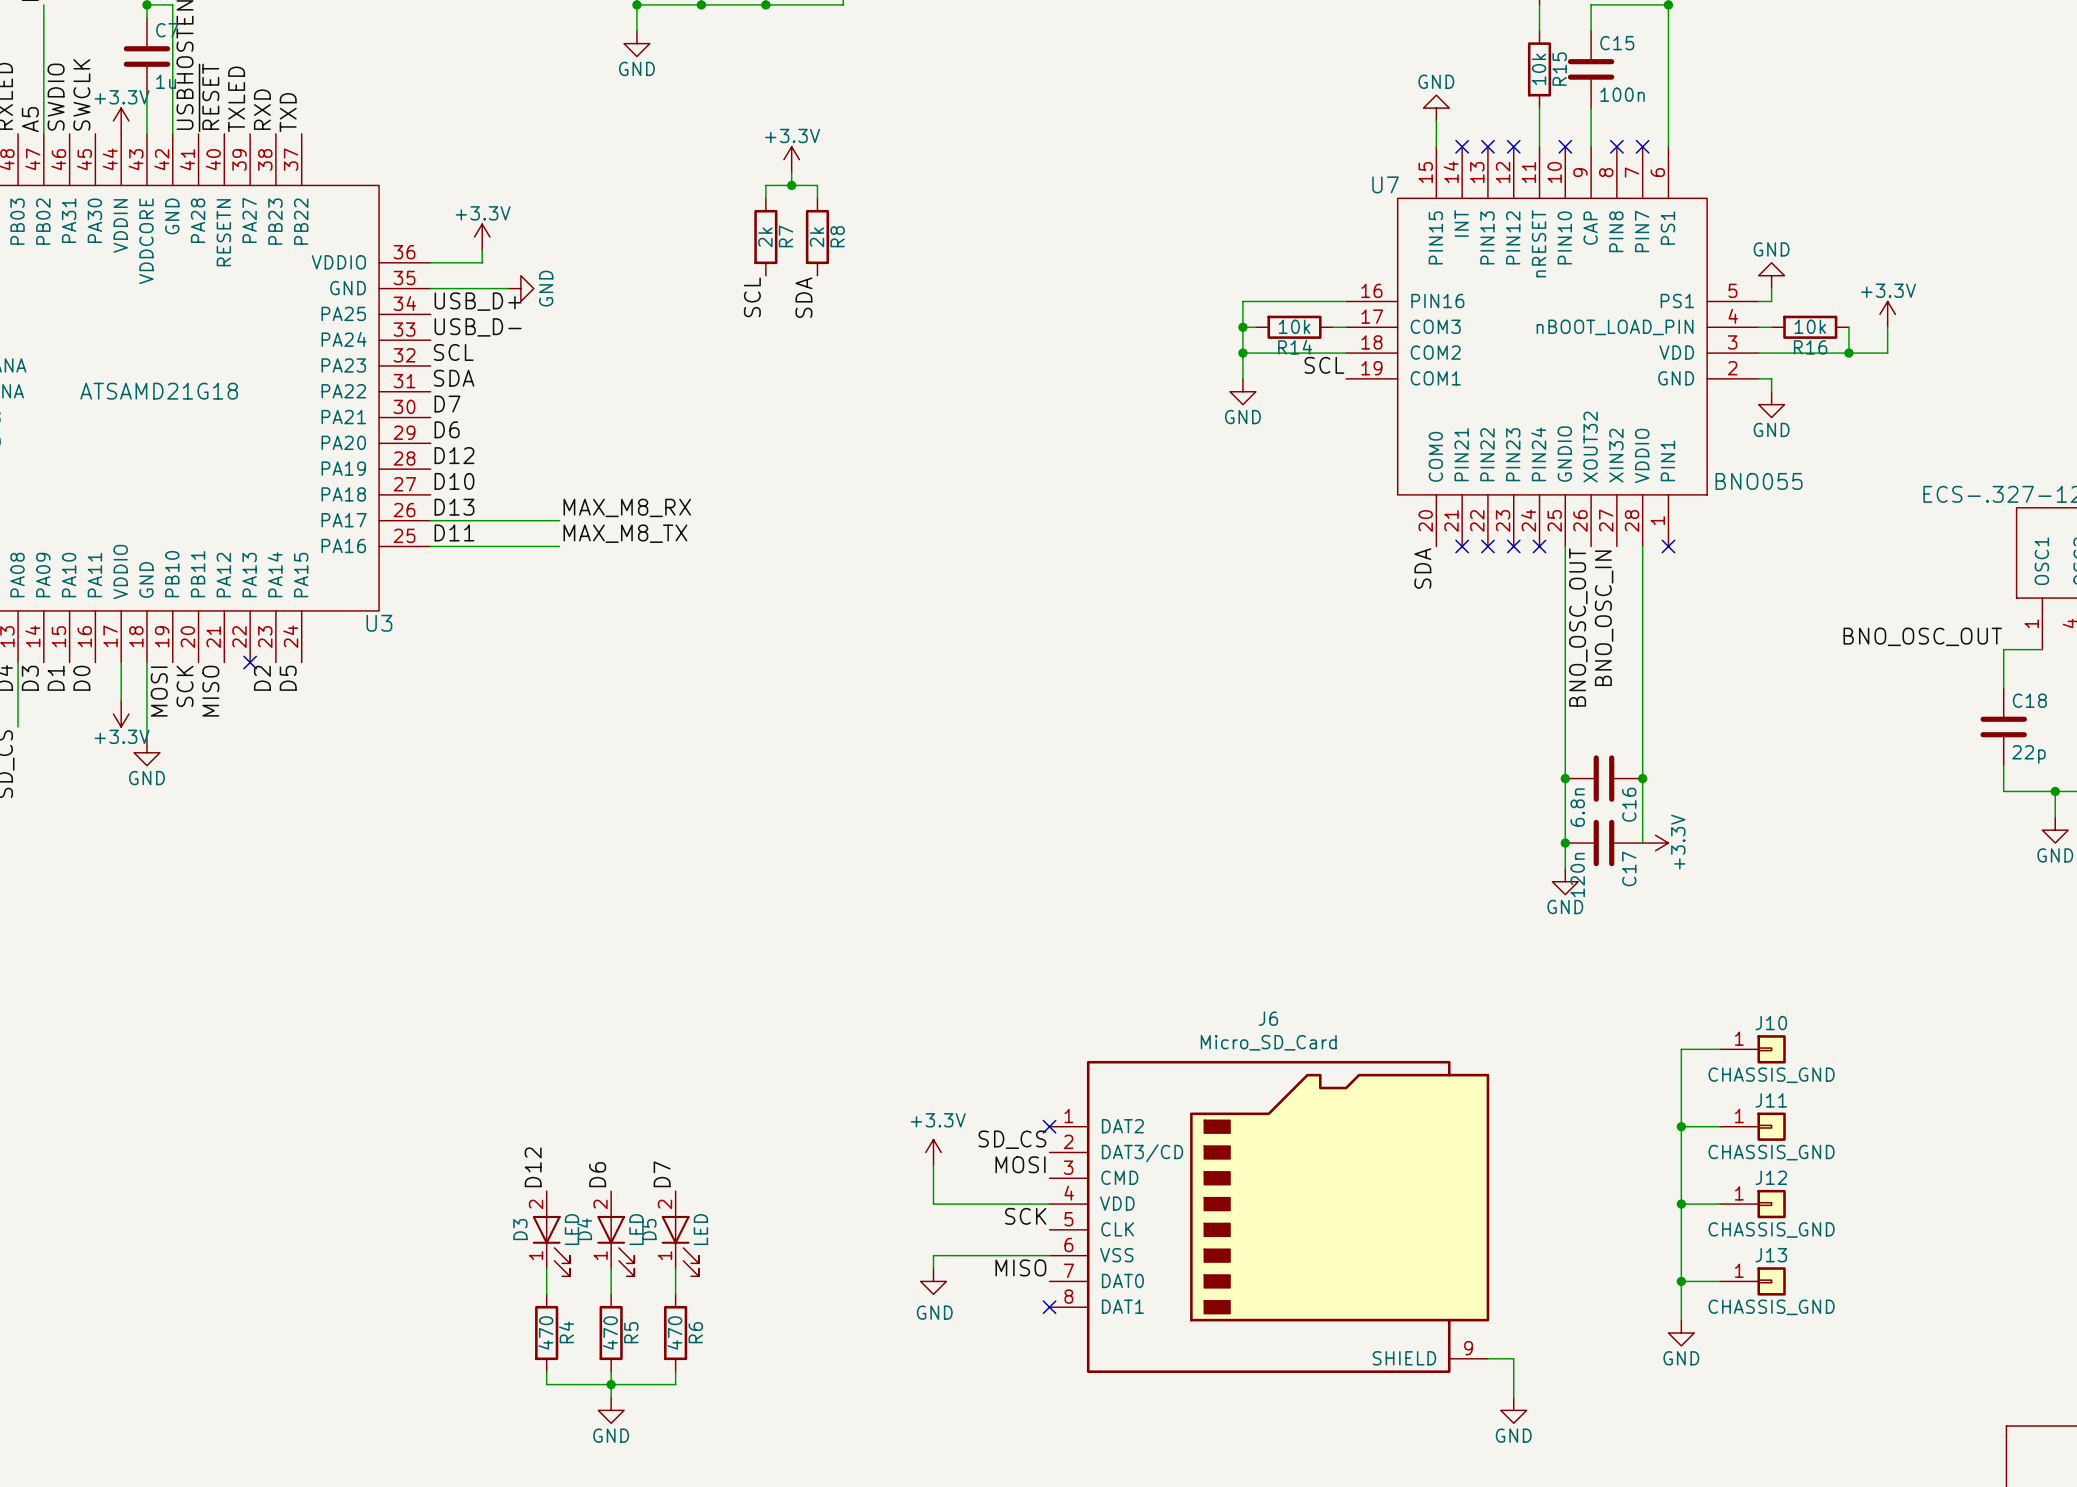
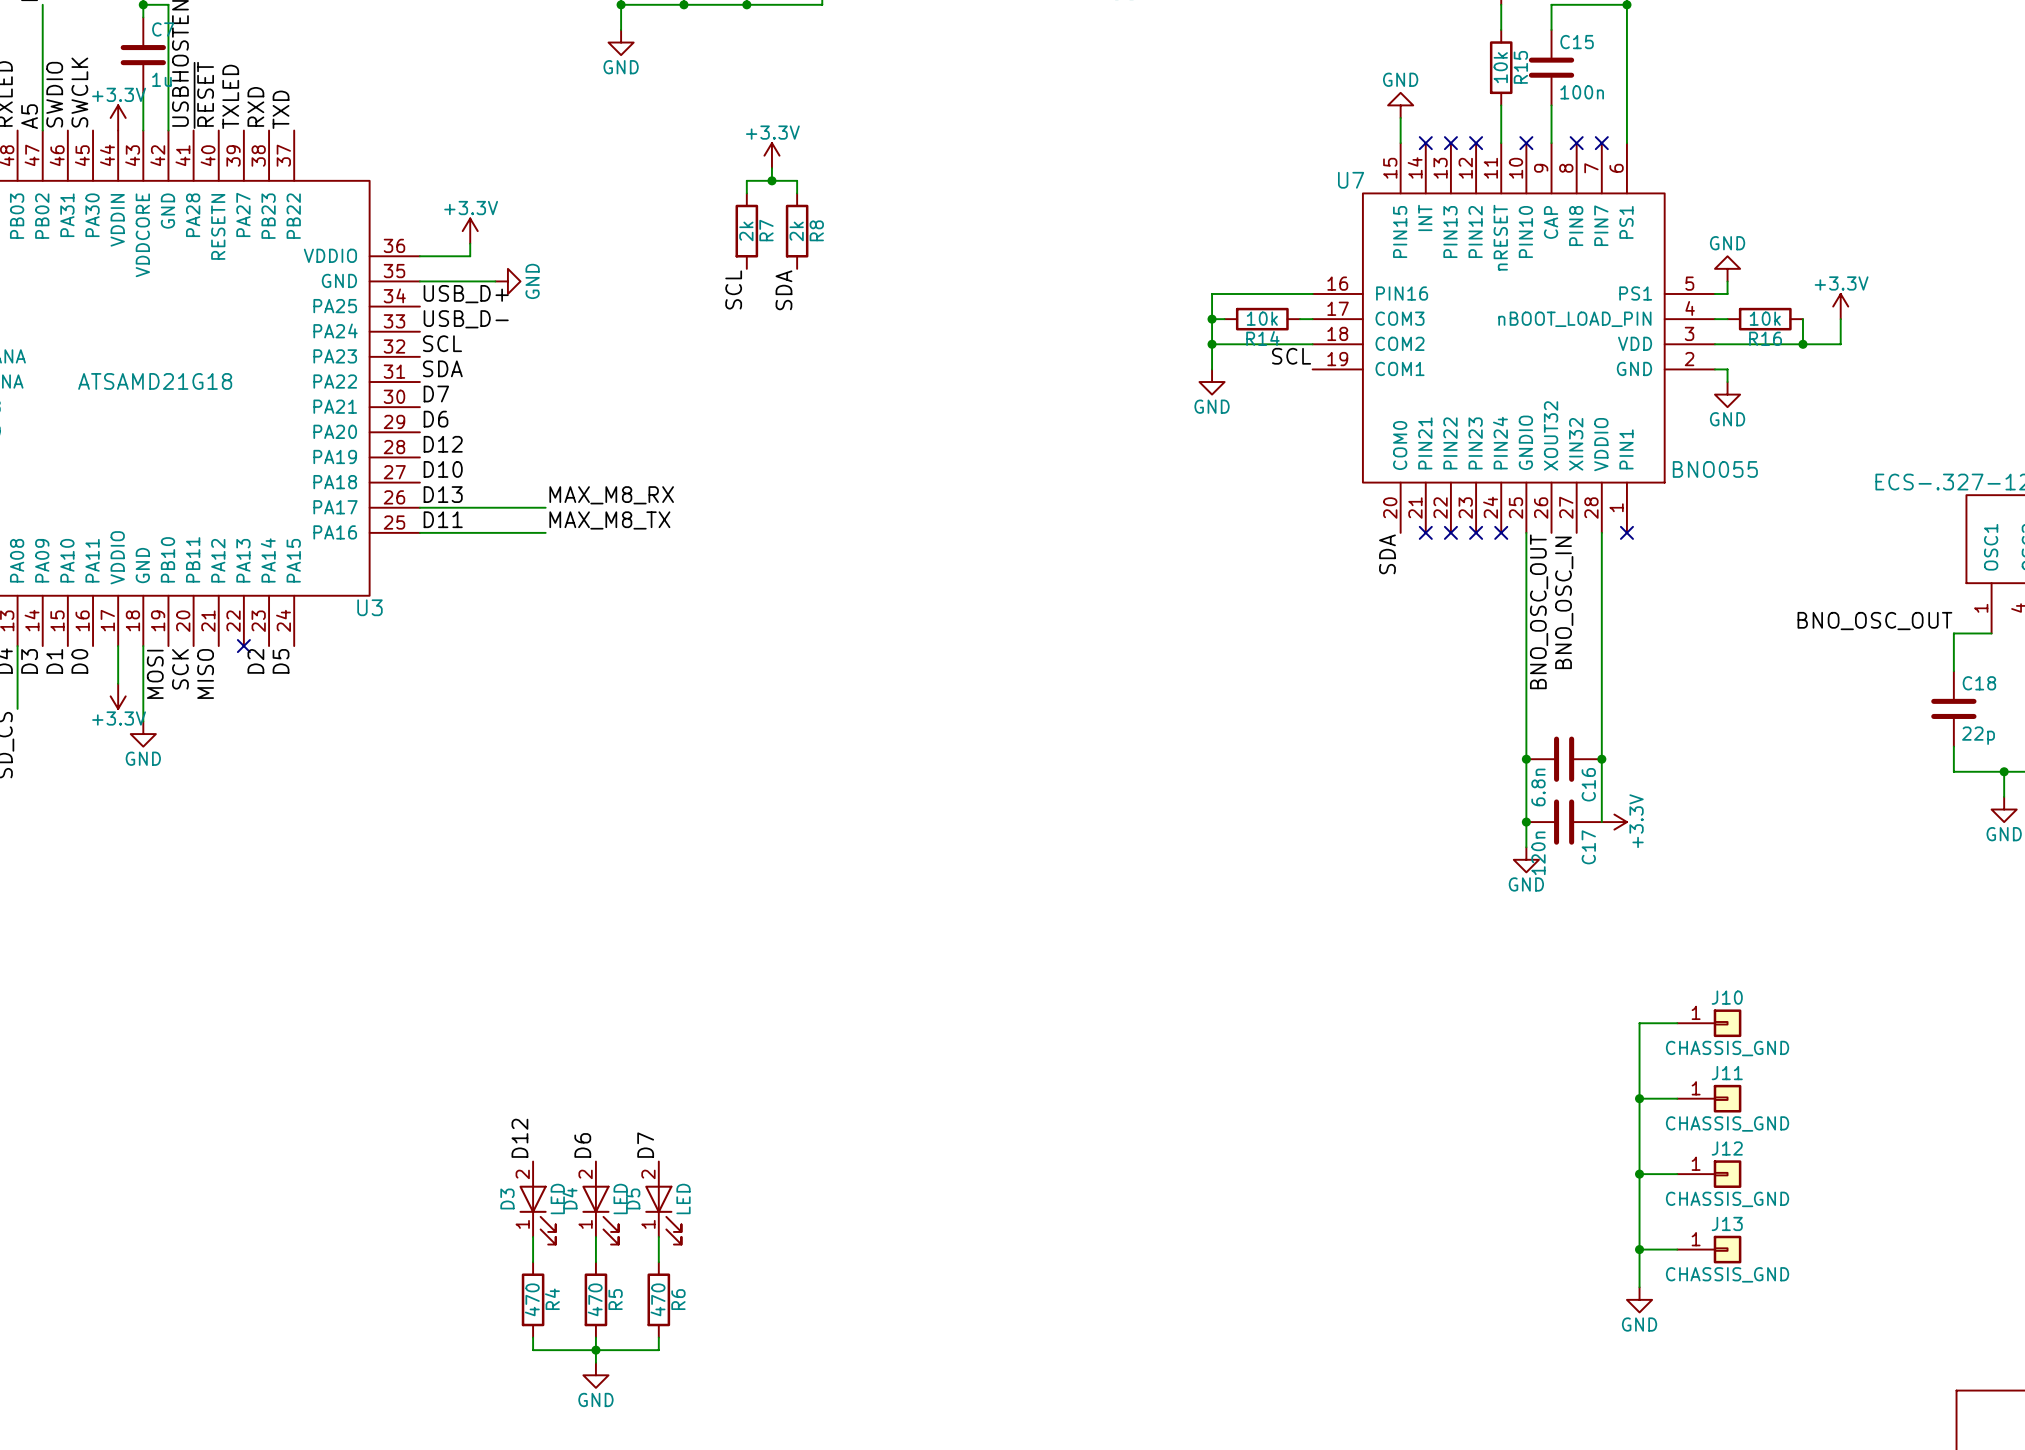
no-connect mark: (1049, 1126) -> none
label: SD_CS (1012, 1139) -> none
power symbol: +3.3V (933, 1152) -> none
label: MOSI (1020, 1164) -> none
wire: (933, 1165) (933, 1204) (1049, 1204) -> none
label: SCK (1025, 1216) -> none
J6: Micro_SD_Card (1269, 1216) -> none
wire: (1049, 1255) (933, 1255) (933, 1268) -> none
label: MISO (1020, 1267) -> none
power symbol: GND (933, 1281) -> none
no-connect mark: (1049, 1307) -> none
wire: (1487, 1358) (1513, 1358) (1513, 1397) -> none
power symbol: GND (1513, 1410) -> none

